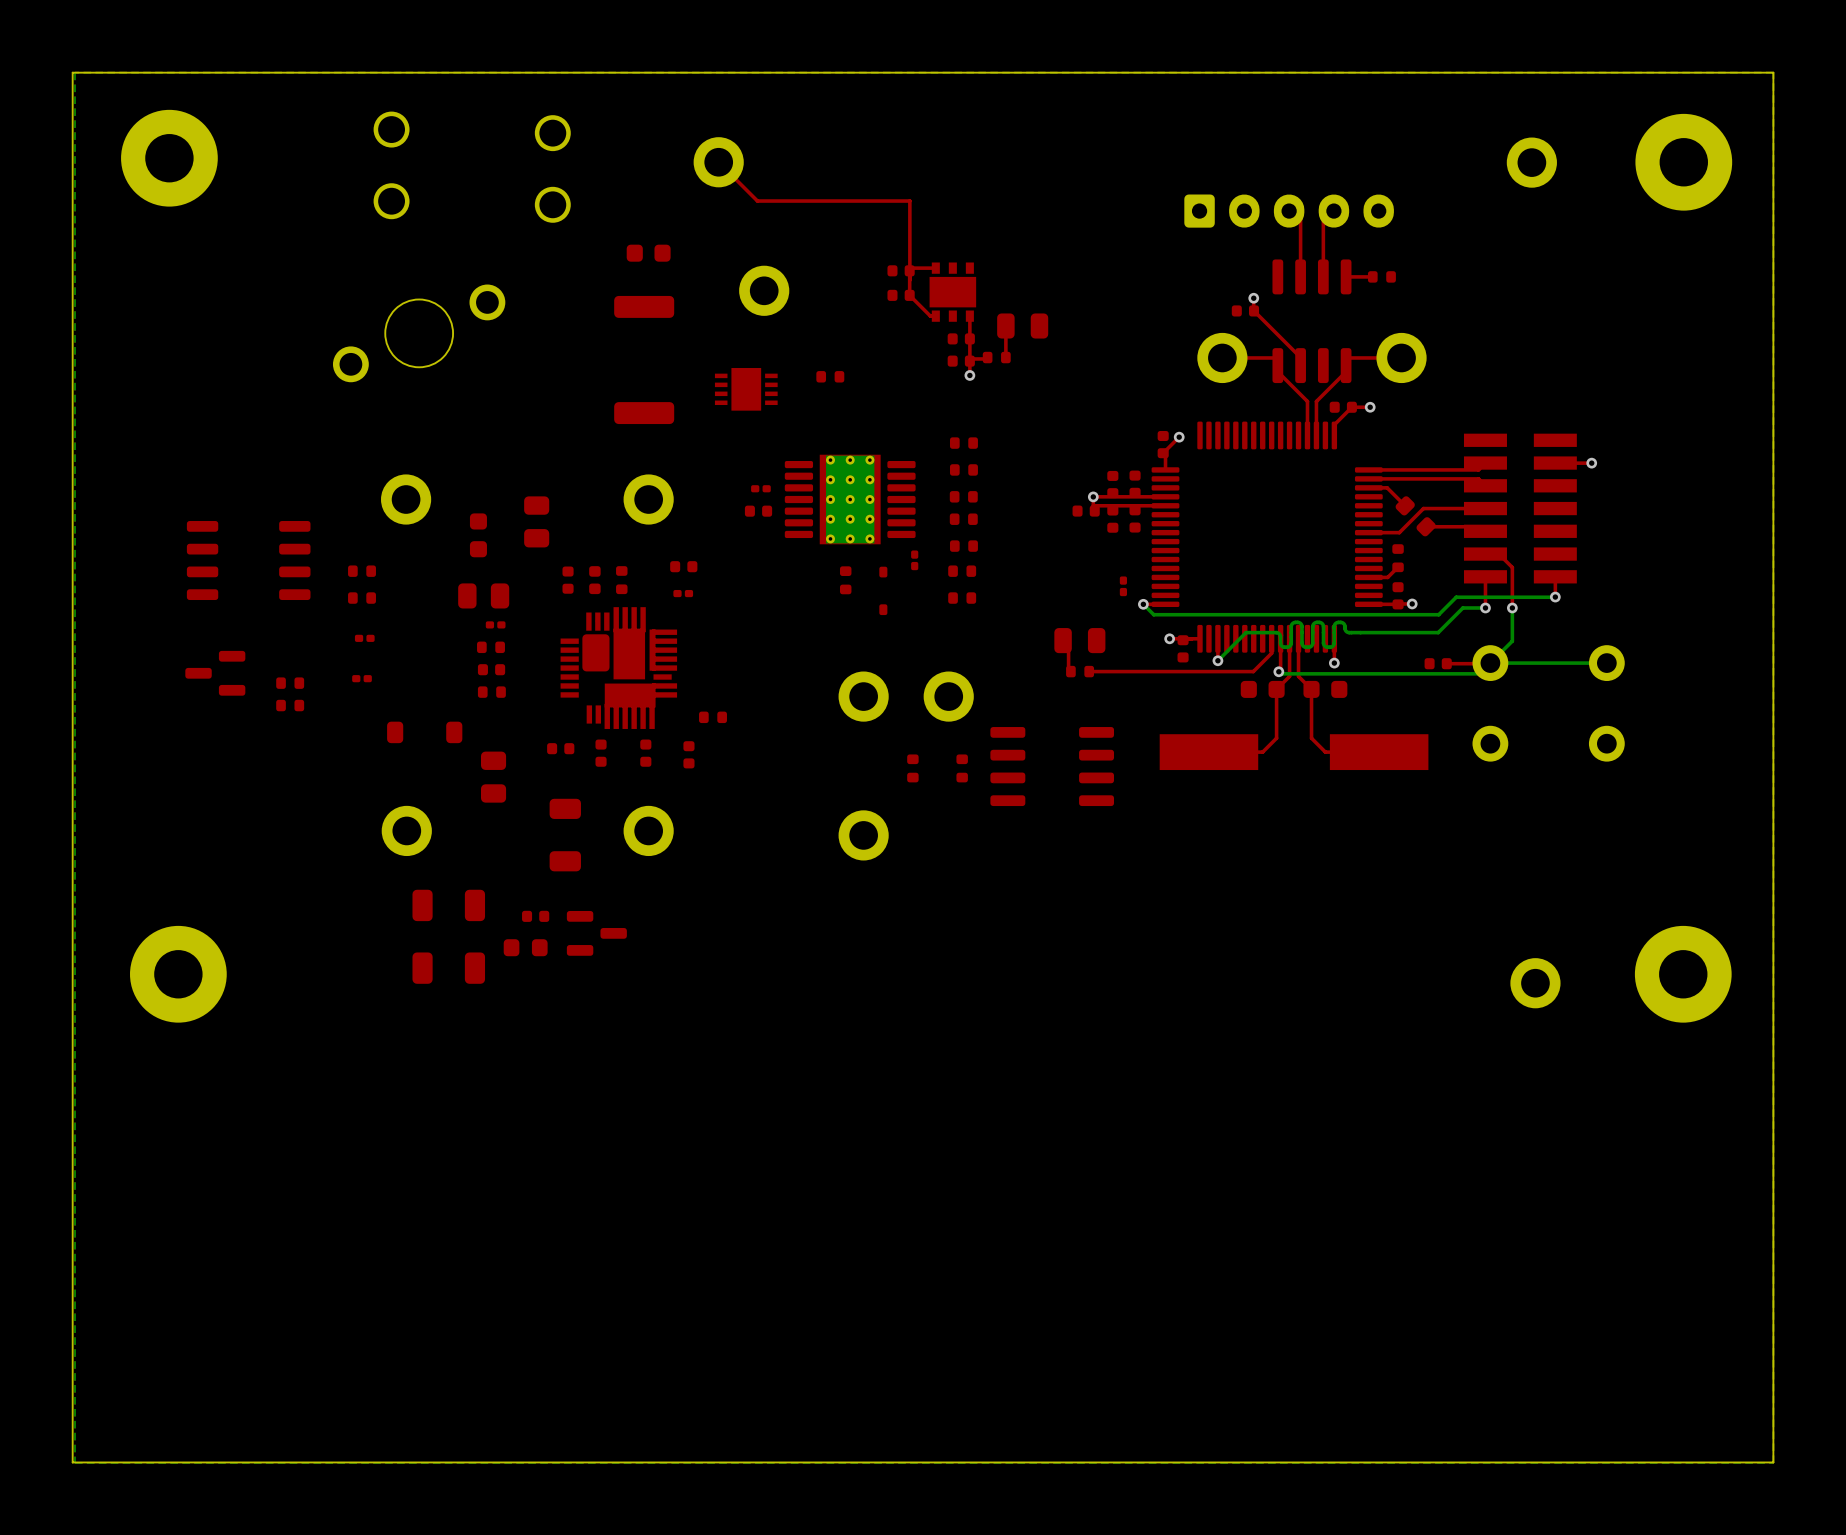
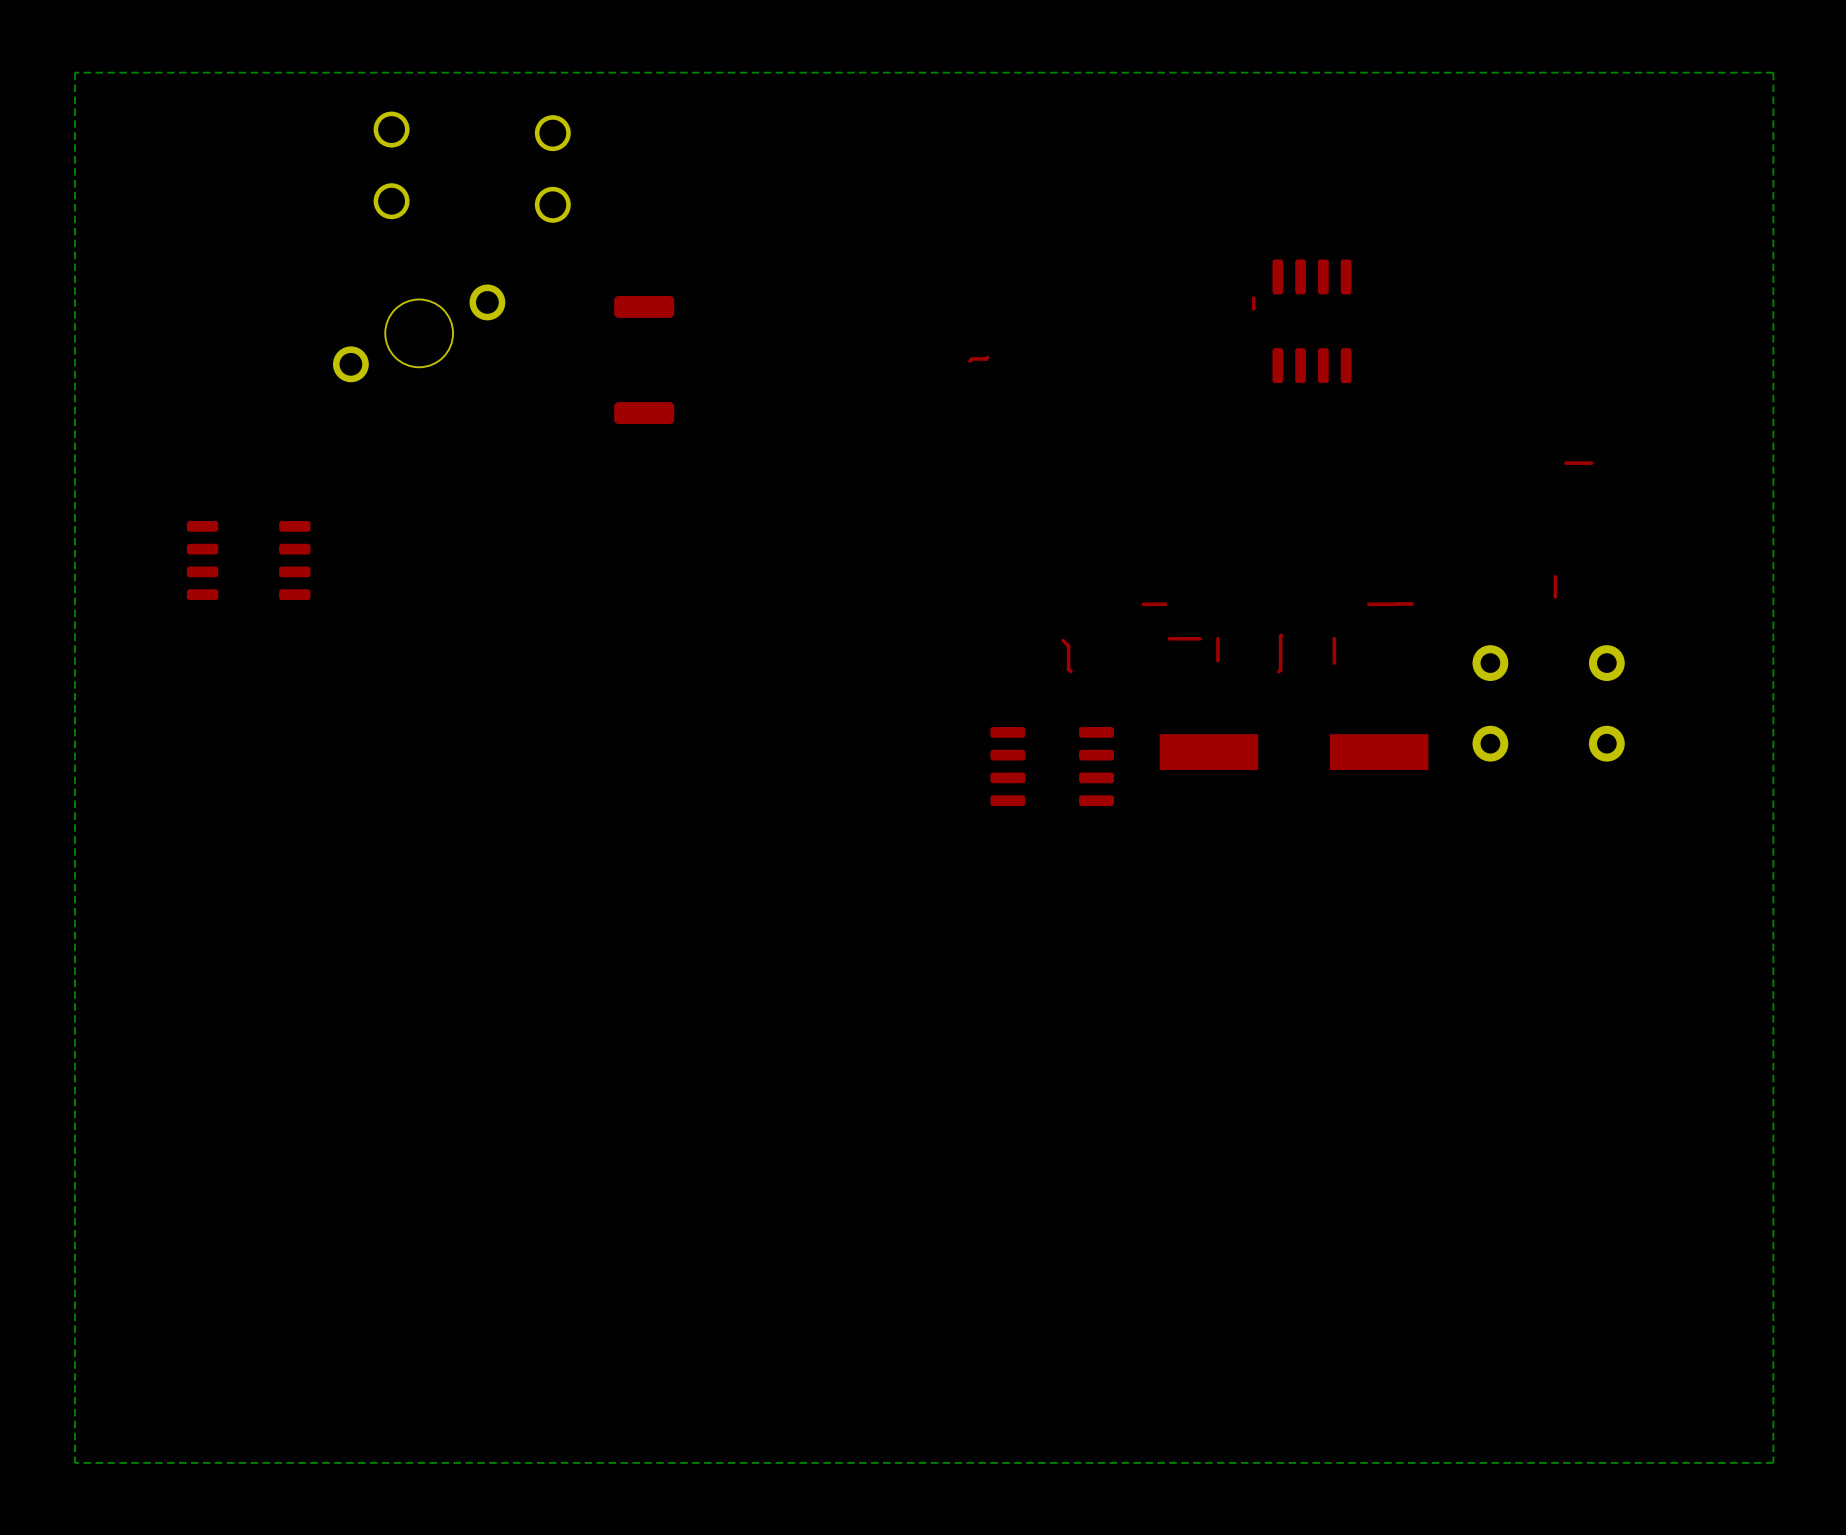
board edge: (1773, 72) (72, 72) (72, 1462) (1773, 1462) (1773, 72) -> none
part: (169, 158) -> none
top track: (718, 162) (757, 201) (909, 201) (909, 280) -> none
part: (718, 162) -> none
part: (1531, 162) -> none
part: (1683, 162) -> none
top track: (1289, 209) (1300, 209) (1300, 276) -> none
top track: (1334, 209) (1323, 209) (1323, 276) -> none
part: (1289, 211) -> none
part: (648, 253) -> none
top track: (935, 268) (912, 268) (909, 270) (909, 295) (930, 316) (935, 316) -> none
part: (901, 270) -> none
top track: (1372, 276) (1346, 276) -> none
part: (1381, 276) -> none
part: (764, 290) -> none
part: (952, 292) -> none
part: (901, 295) -> none
via: (1253, 298) -> none
part: (1245, 310) -> none
top track: (1254, 310) (1300, 357) (1300, 365) -> none
top track: (969, 316) (969, 375) -> none
top track: (1005, 326) (1005, 357) -> none
part: (1022, 326) -> none
part: (961, 338) -> none
part: (996, 357) -> none
top track: (1222, 357) (1277, 357) (1277, 371) (1307, 401) (1307, 435) -> none
part: (1222, 357) -> none
top track: (1401, 357) (1346, 357) (1346, 371) (1316, 401) (1316, 435) -> none
part: (1401, 357) -> none
part: (961, 361) -> none
via: (969, 375) -> none
part: (830, 376) -> none
part: (746, 389) -> none
part: (1343, 407) -> none
top track: (1370, 407) (1351, 407) (1334, 424) (1334, 435) -> none
via: (1370, 407) -> none
top track: (1179, 437) (1163, 453) (1165, 455) (1165, 469) -> none
via: (1179, 437) -> none
part: (963, 443) -> none
part: (1163, 444) -> none
top track: (1485, 463) (1478, 469) (1368, 469) -> none
via: (1591, 463) -> none
part: (963, 469) -> none
top track: (1368, 478) (1478, 478) (1485, 485) -> none
part: (1112, 484) -> none
part: (1135, 484) -> none
top track: (1368, 487) (1387, 487) (1405, 505) -> none
part: (760, 488) -> none
part: (963, 496) -> none
top track: (1093, 496) (1093, 505) (1165, 505) -> none
via: (1093, 496) -> none
top track: (1165, 496) (1093, 496) -> none
part: (406, 499) -> none
part: (648, 499) -> none
part: (850, 499) -> none
top track: (1485, 508) (1423, 508) (1399, 532) (1368, 532) -> none
part: (1520, 508) -> none
part: (758, 511) -> none
part: (1086, 511) -> none
part: (1415, 516) -> none
part: (1135, 518) -> none
part: (963, 519) -> none
part: (1112, 519) -> none
part: (536, 521) -> none
top track: (1426, 526) (1480, 526) (1485, 531) -> none
part: (478, 535) -> none
part: (1267, 537) -> none
part: (963, 546) -> none
top track: (1485, 554) (1498, 554) (1512, 567) (1512, 607) -> none
part: (1398, 558) -> none
part: (914, 560) -> none
part: (683, 566) -> none
top track: (1398, 567) (1387, 577) (1368, 577) -> none
part: (362, 571) -> none
part: (962, 571) -> none
top track: (1485, 576) (1485, 607) -> none
part: (568, 580) -> none
part: (594, 580) -> none
part: (621, 580) -> none
part: (845, 580) -> none
part: (1123, 586) -> none
part: (883, 590) -> none
part: (683, 593) -> none
part: (483, 595) -> none
part: (1398, 595) -> none
bottom track: (1555, 597) (1456, 597) (1438, 614) (1153, 614) (1143, 604) -> none
via: (1555, 597) -> none
part: (362, 598) -> none
part: (962, 598) -> none
via: (1412, 603) -> none
via: (1143, 604) -> none
bottom track: (1485, 607) (1462, 607) (1438, 632) (1348, 632) (1345, 630) (1343, 623) (1337, 622) (1334, 626) (1334, 643) (1330, 647) (1323, 644) (1323, 626) (1321, 623) (1313, 624) (1312, 644) (1306, 647) (1302, 643) (1301, 624) (1294, 622) (1291, 625) (1291, 643) (1288, 646) (1281, 645) (1280, 635) (1277, 632) (1246, 632) (1217, 660) -> none
via: (1485, 607) -> none
bottom track: (1512, 607) (1512, 641) (1479, 673) (1282, 673) (1278, 671) -> none
via: (1512, 607) -> none
part: (495, 624) -> none
part: (364, 638) -> none
via: (1169, 638) -> none
top track: (1271, 638) (1271, 653) (1253, 671) (1089, 671) -> none
top track: (1289, 638) (1289, 676) (1276, 689) (1276, 738) (1262, 752) (1208, 752) -> none
top track: (1298, 638) (1298, 676) (1311, 689) (1311, 738) (1325, 752) (1379, 752) -> none
part: (1079, 640) -> none
part: (491, 647) -> none
part: (1183, 648) -> none
via: (1217, 660) -> none
via: (1334, 663) -> none
part: (1438, 663) -> none
top track: (1490, 663) (1446, 663) -> none
bottom track: (1606, 663) (1490, 663) -> none
part: (618, 668) -> none
part: (491, 669) -> none
part: (1080, 671) -> none
via: (1278, 671) -> none
part: (215, 673) -> none
part: (362, 678) -> none
part: (290, 683) -> none
part: (1262, 689) -> none
part: (1325, 689) -> none
part: (491, 692) -> none
part: (863, 696) -> none
part: (948, 696) -> none
part: (290, 705) -> none
part: (713, 717) -> none
part: (424, 732) -> none
part: (560, 748) -> none
part: (601, 753) -> none
part: (645, 753) -> none
part: (688, 754) -> none
part: (912, 768) -> none
part: (962, 768) -> none
part: (493, 777) -> none
part: (406, 830) -> none
part: (648, 830) -> none
part: (565, 835) -> none
part: (863, 835) -> none
part: (448, 905) -> none
part: (535, 916) -> none
part: (596, 933) -> none
part: (525, 947) -> none
part: (448, 968) -> none
part: (178, 974) -> none
part: (1683, 974) -> none
part: (1535, 983) -> none

